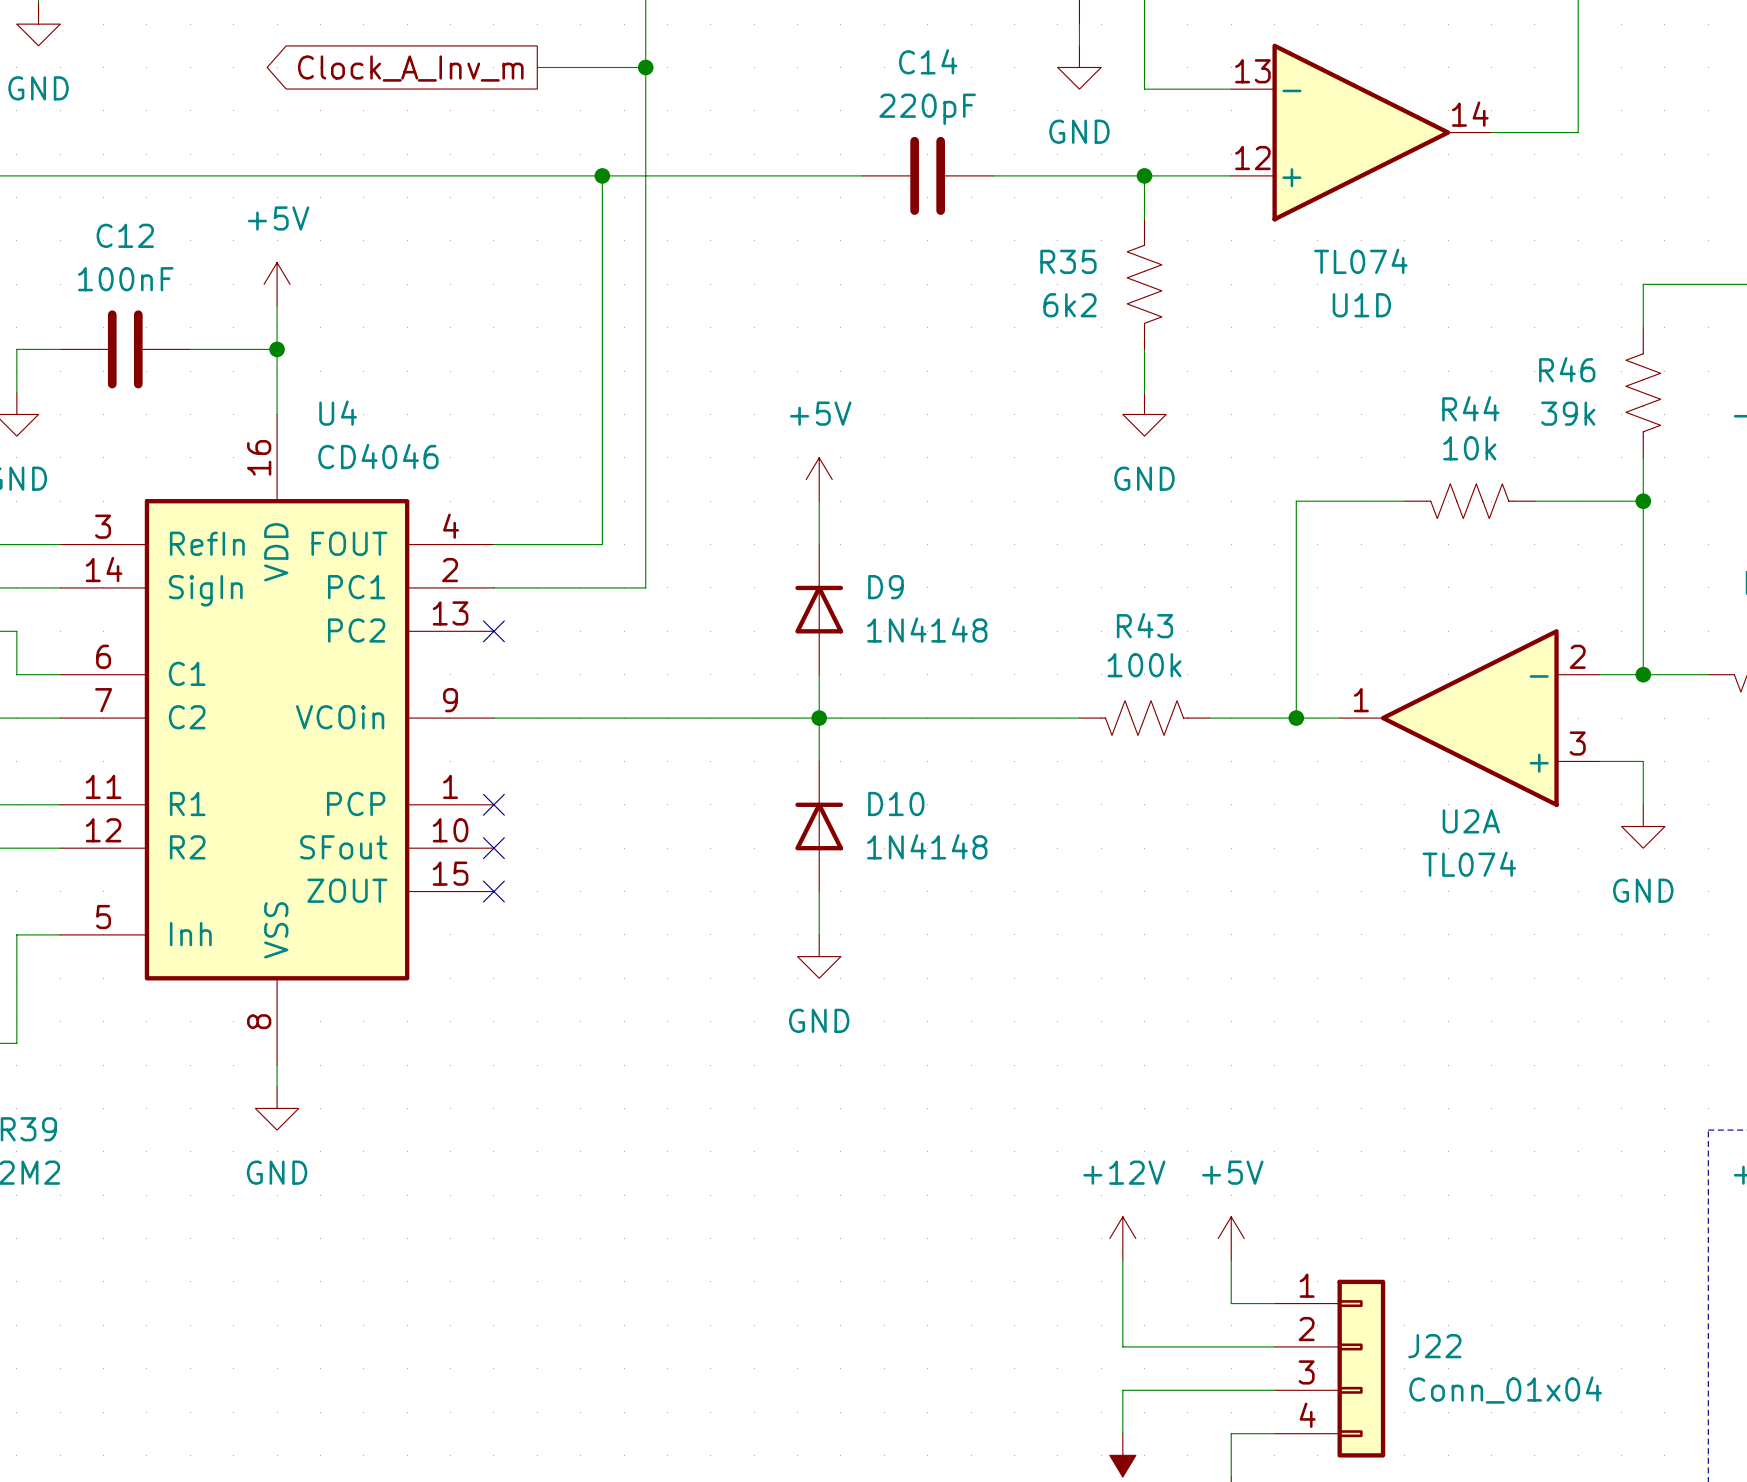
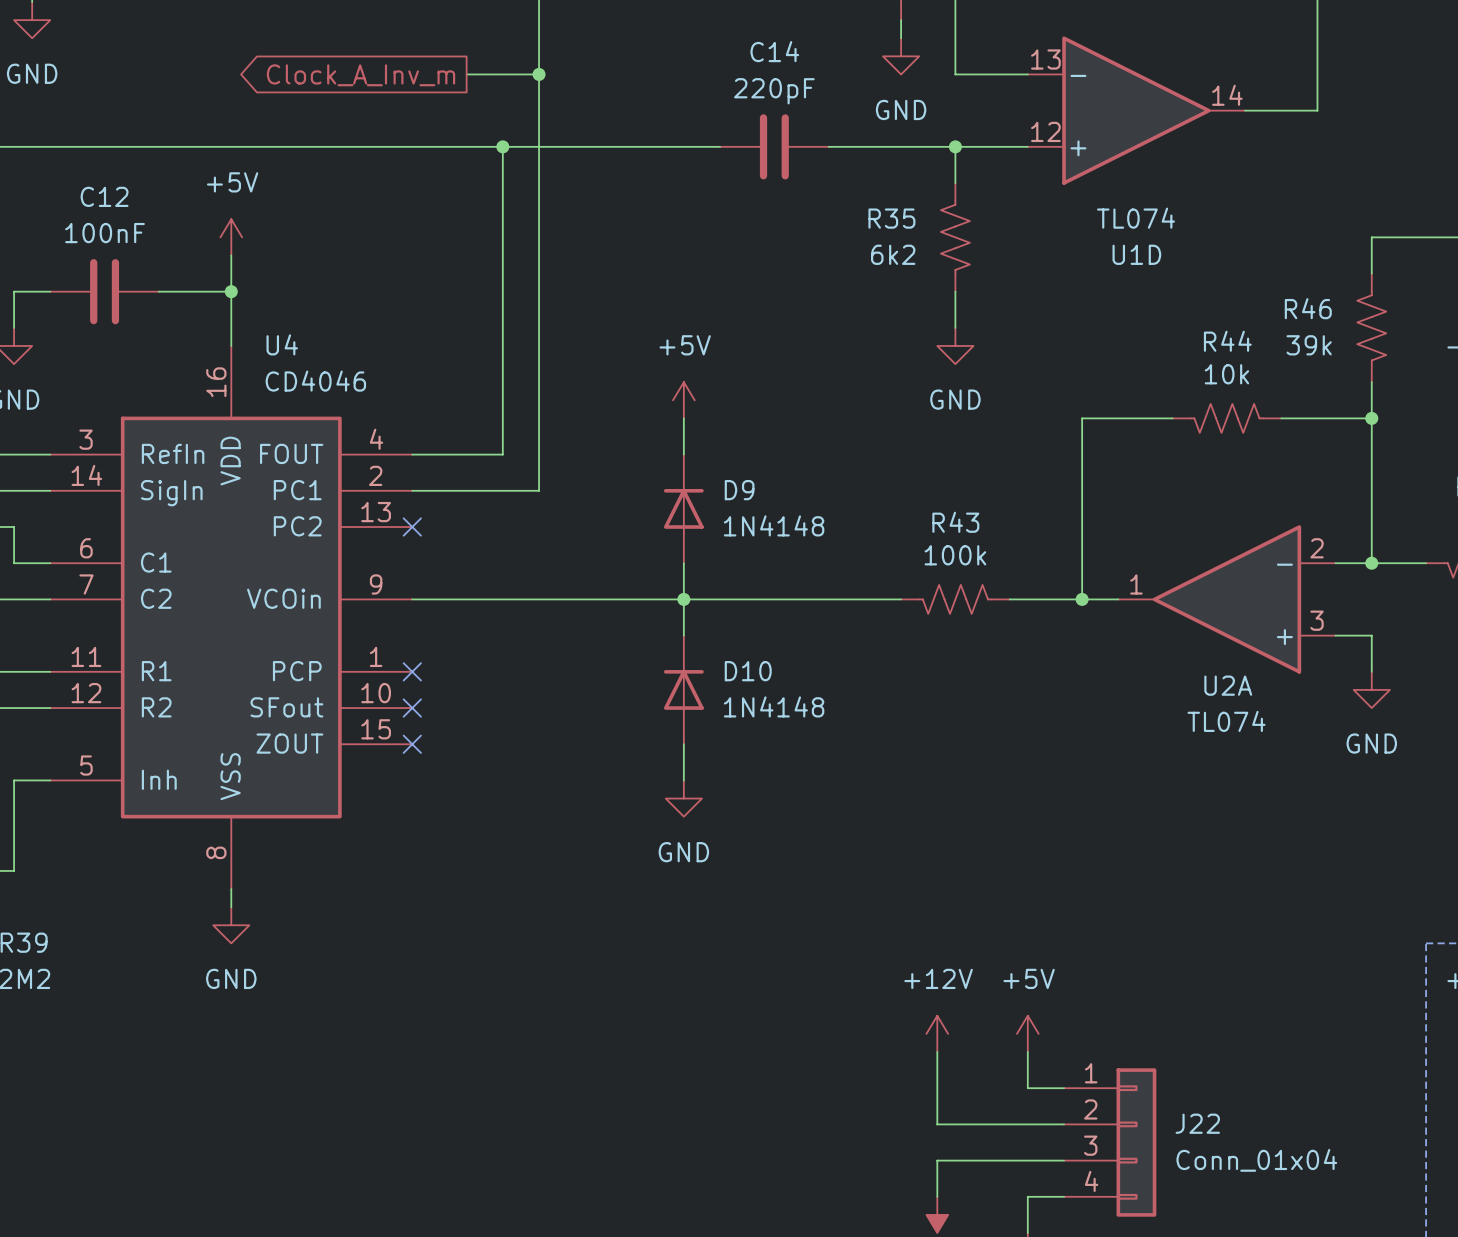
wire: (537, 67) (645, 67) -> none
junction position: (645, 67) -> (539, 74)
global label position: Clock_A_Inv_m (410, 68) -> Clock_A_Inv_m (361, 75)
wire: none -> (466, 74) (539, 74)

